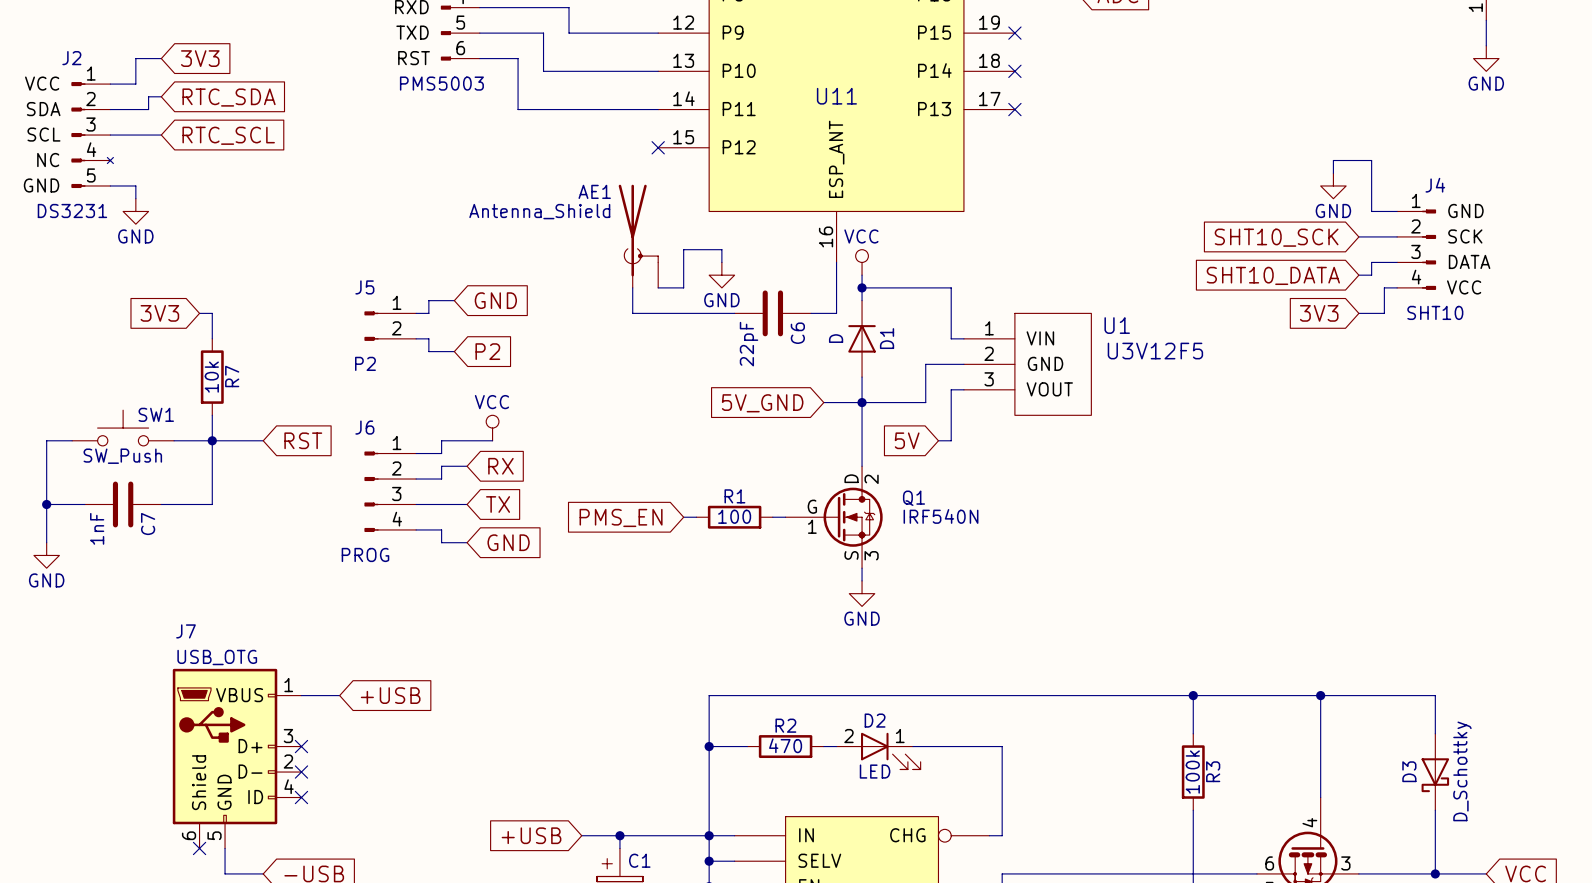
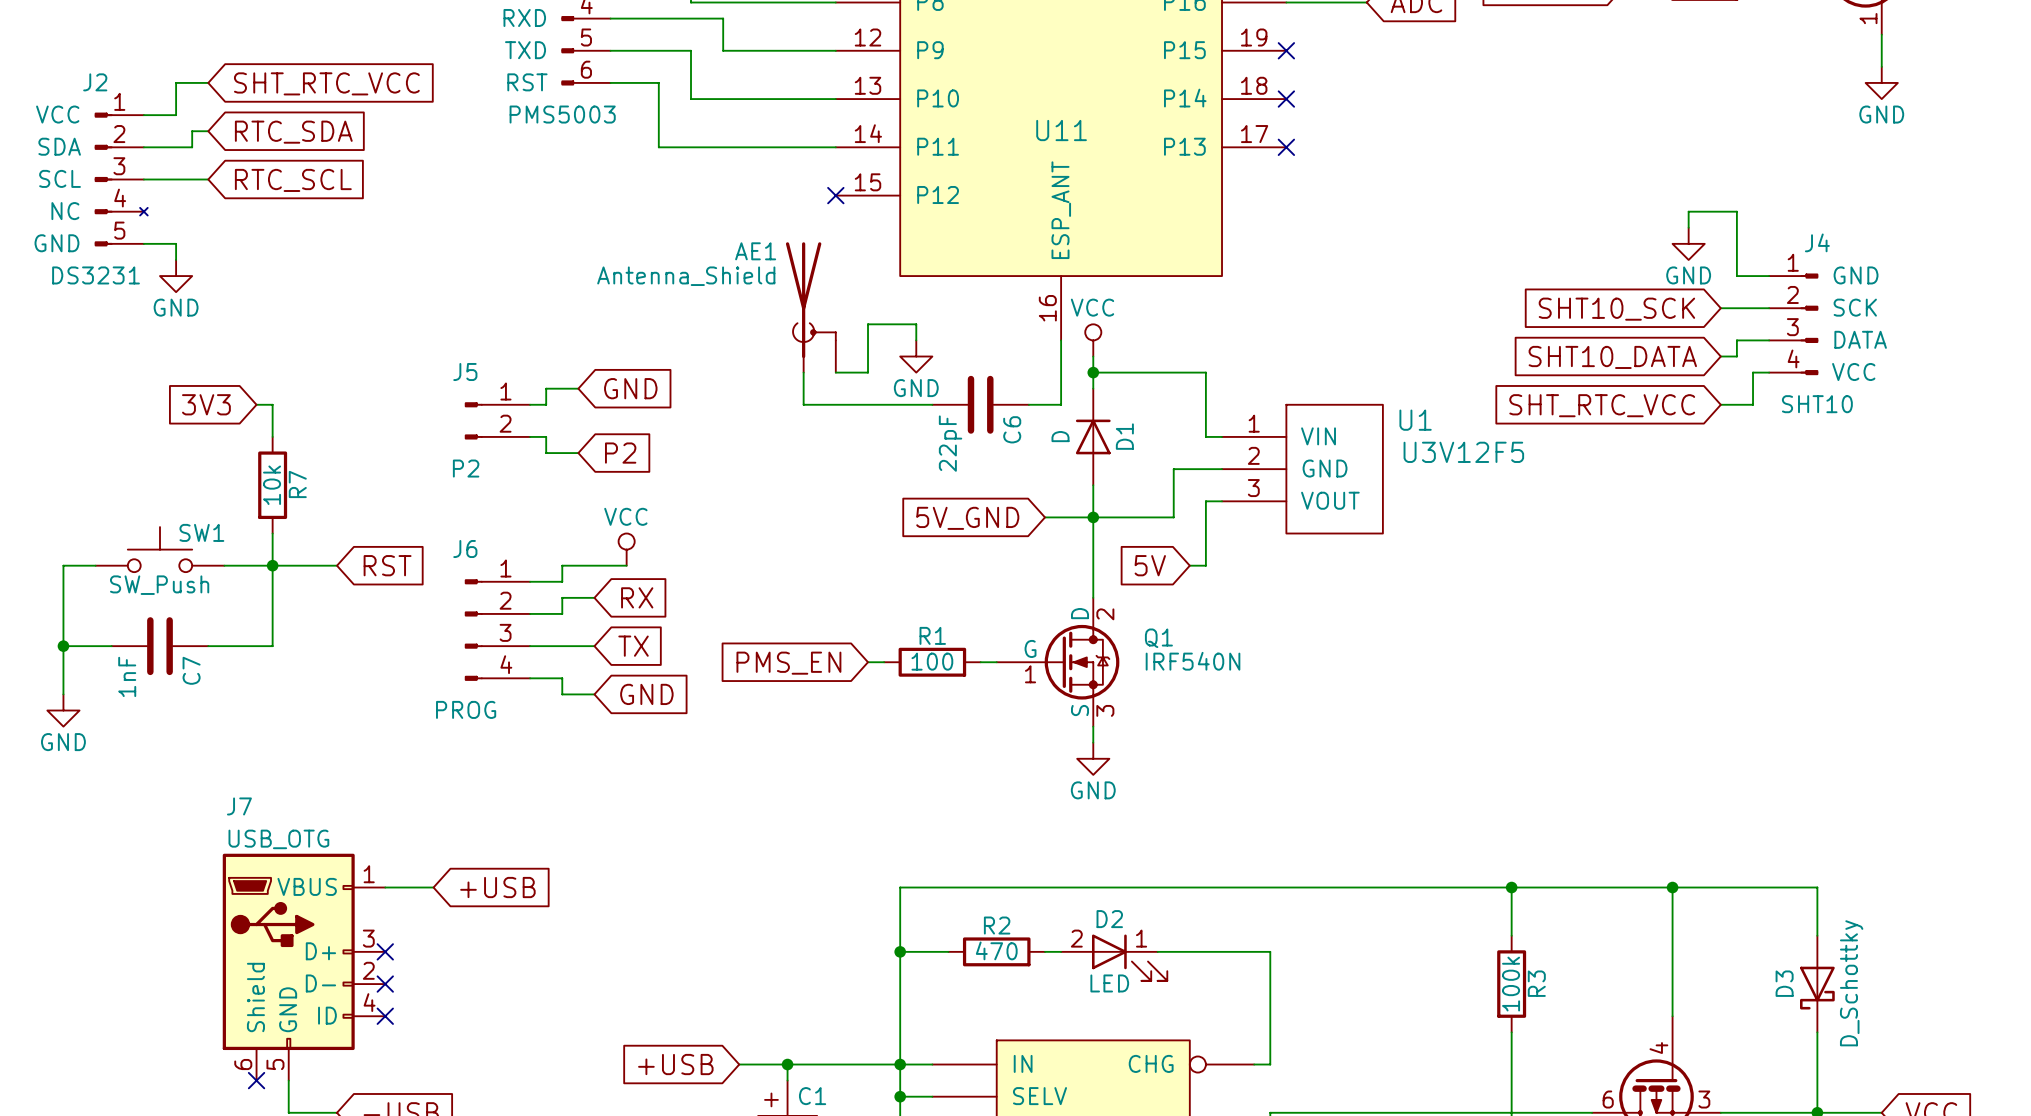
global label: 3V3 (200, 58) -> SHT_RTC_VCC (326, 83)
global label: 3V3 (1319, 313) -> SHT_RTC_VCC (1602, 405)

